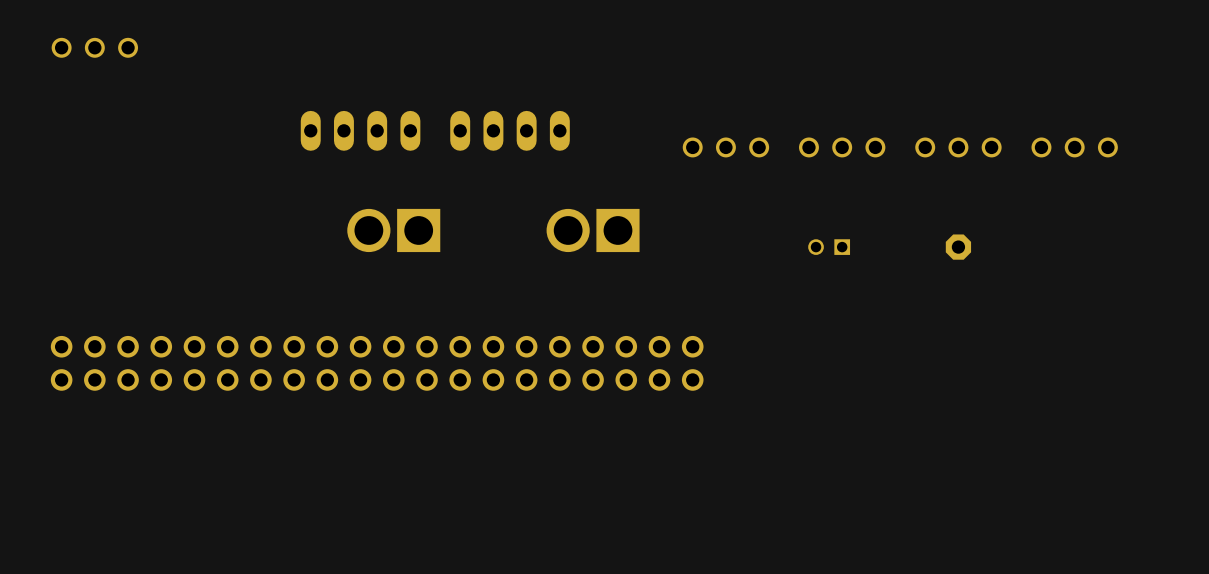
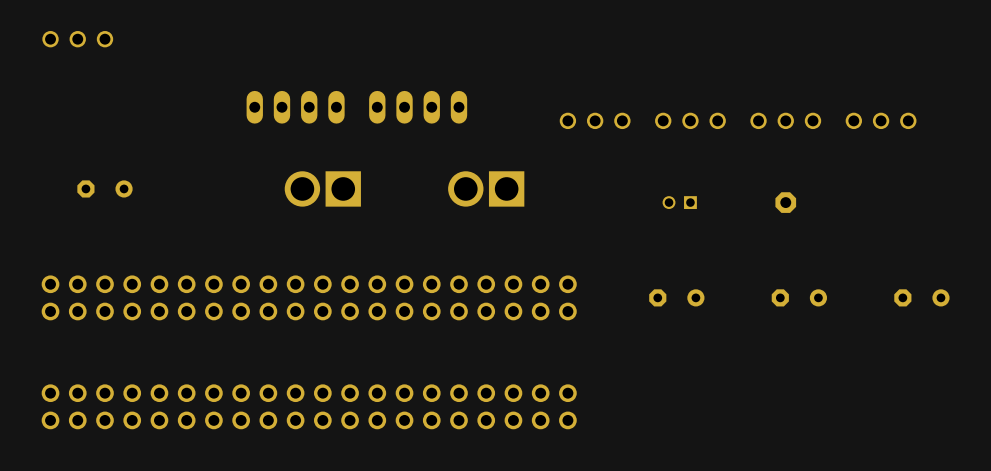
part: none -> (104, 188)
part: none -> (676, 297)
part: none -> (799, 297)
part: none -> (921, 297)
part: none -> (309, 406)

